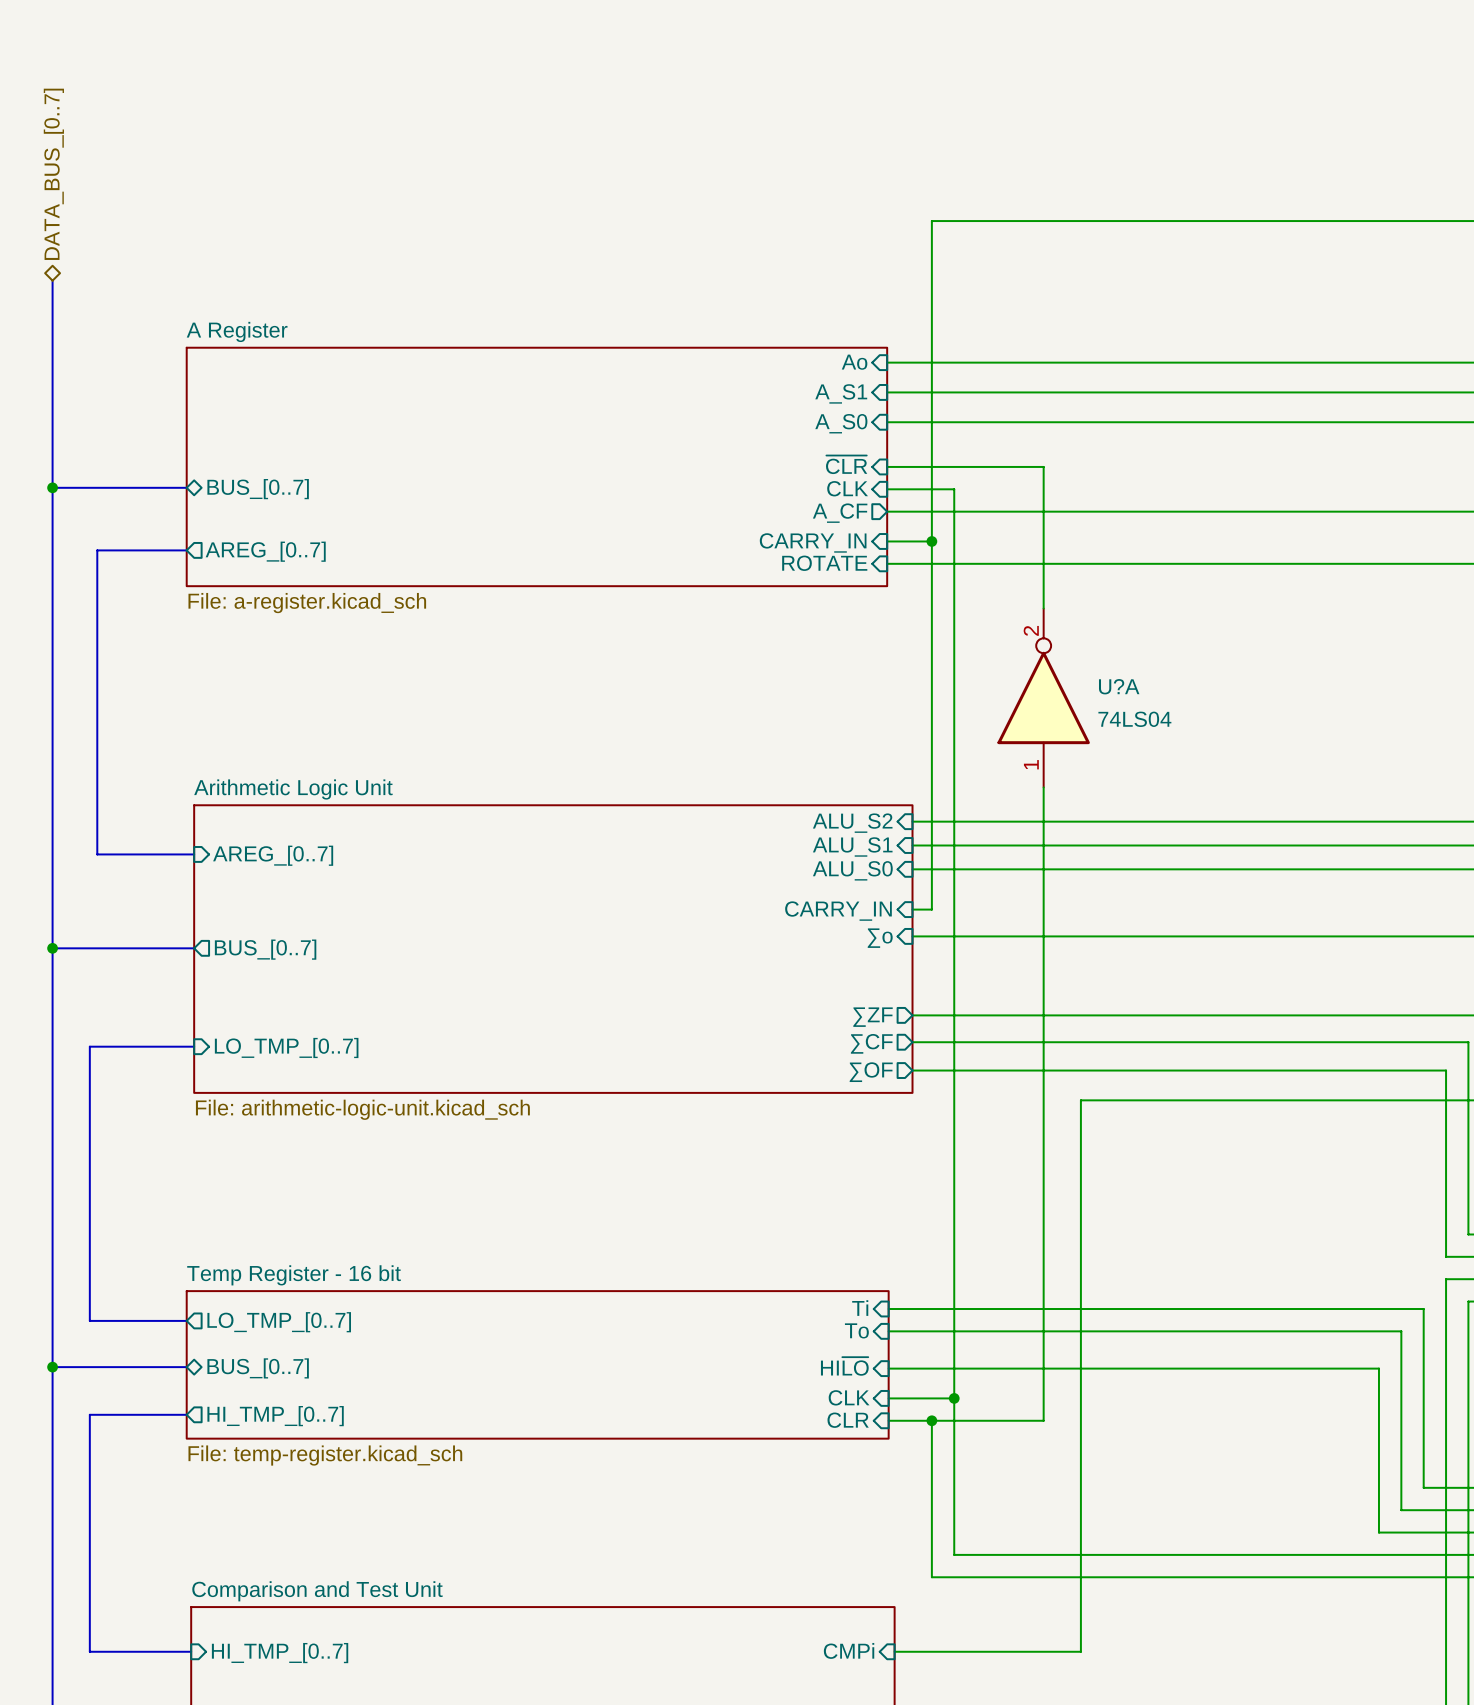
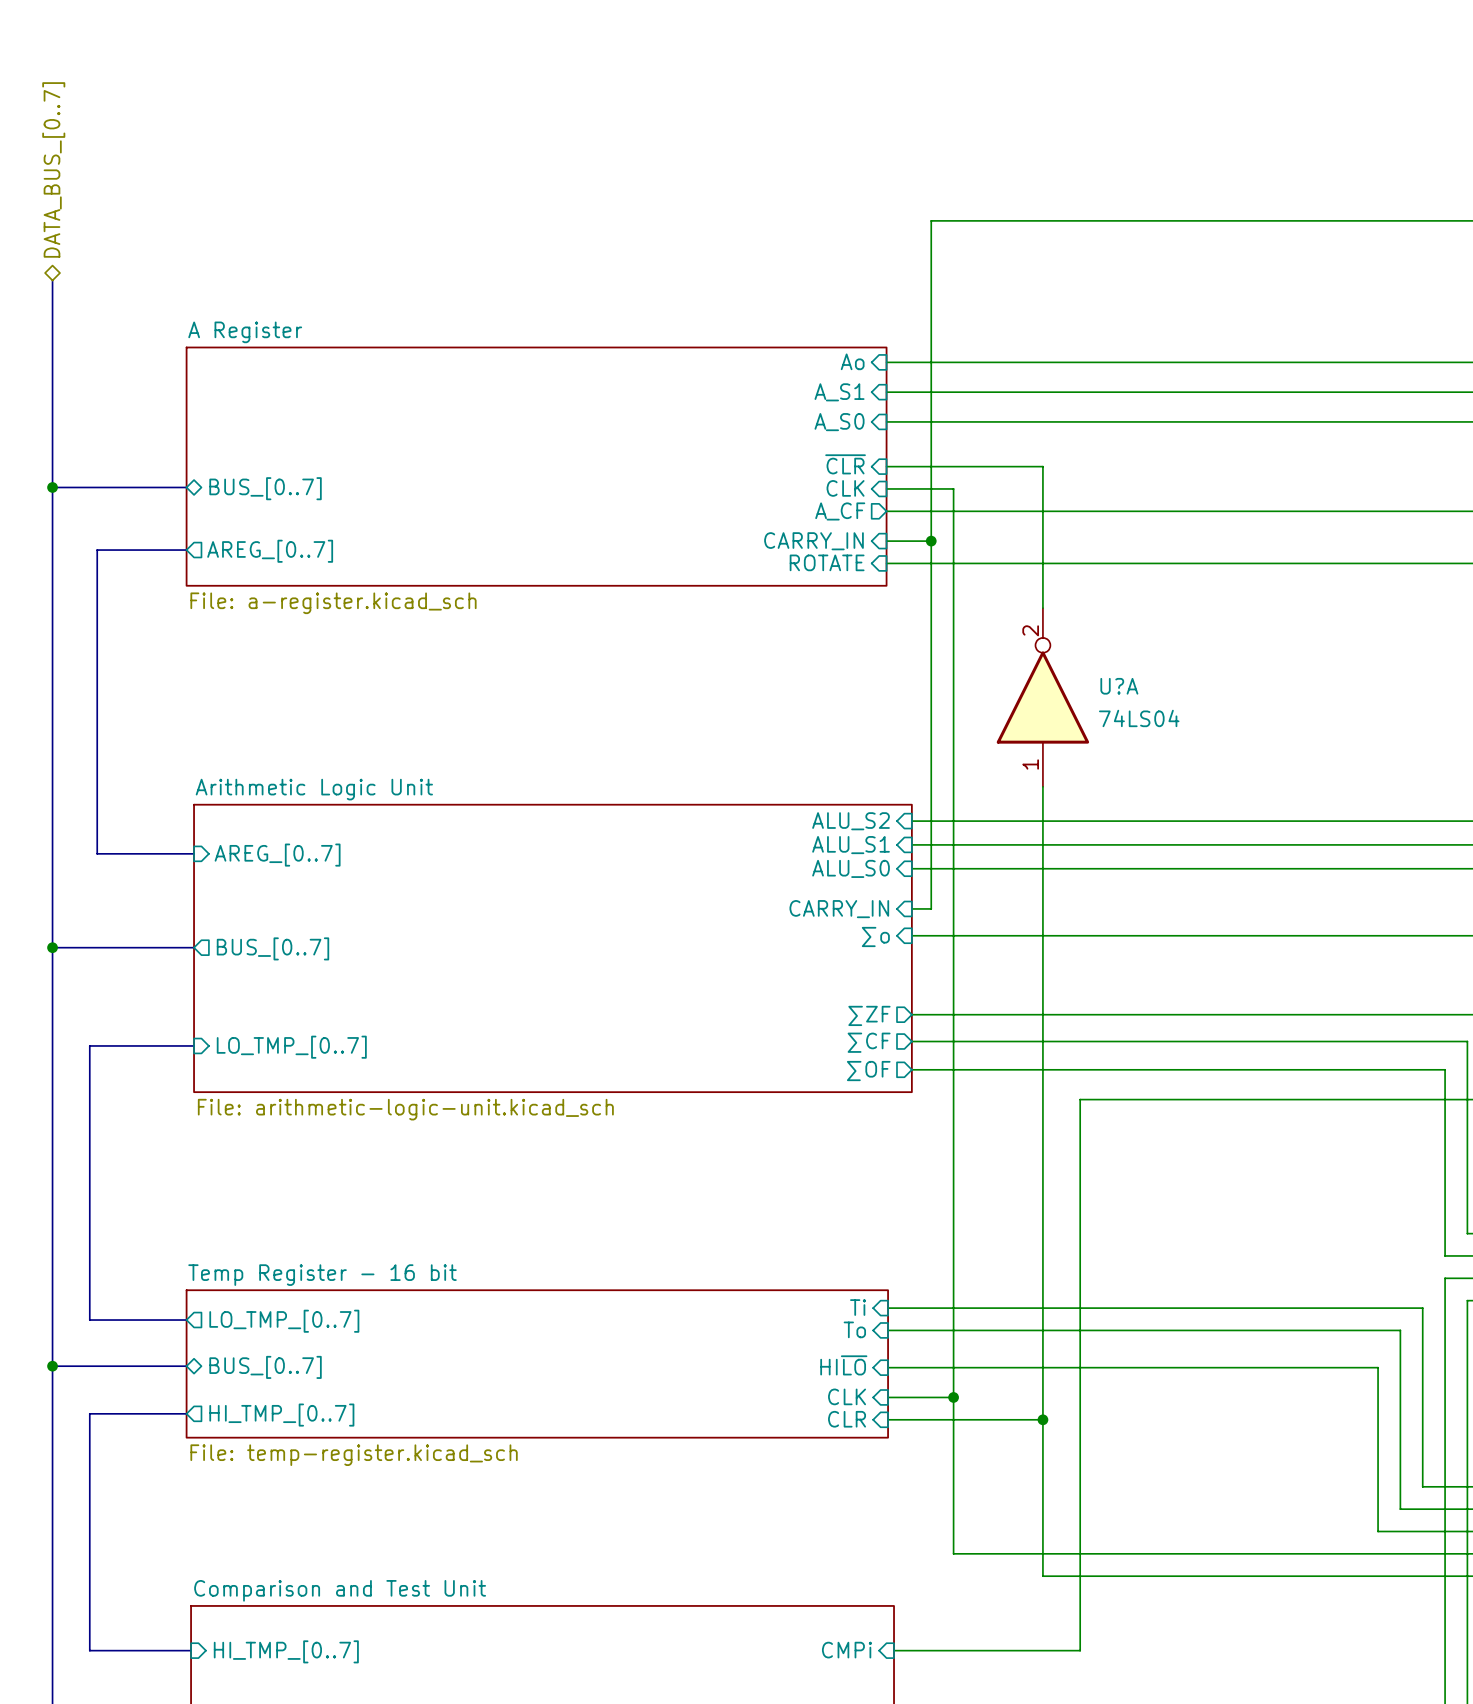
wire: (931, 1420) (931, 1577) (1043, 1577) -> (1042, 1419) (1042, 1576)
junction: (931, 1420) -> none
junction: none -> (1042, 1419)

